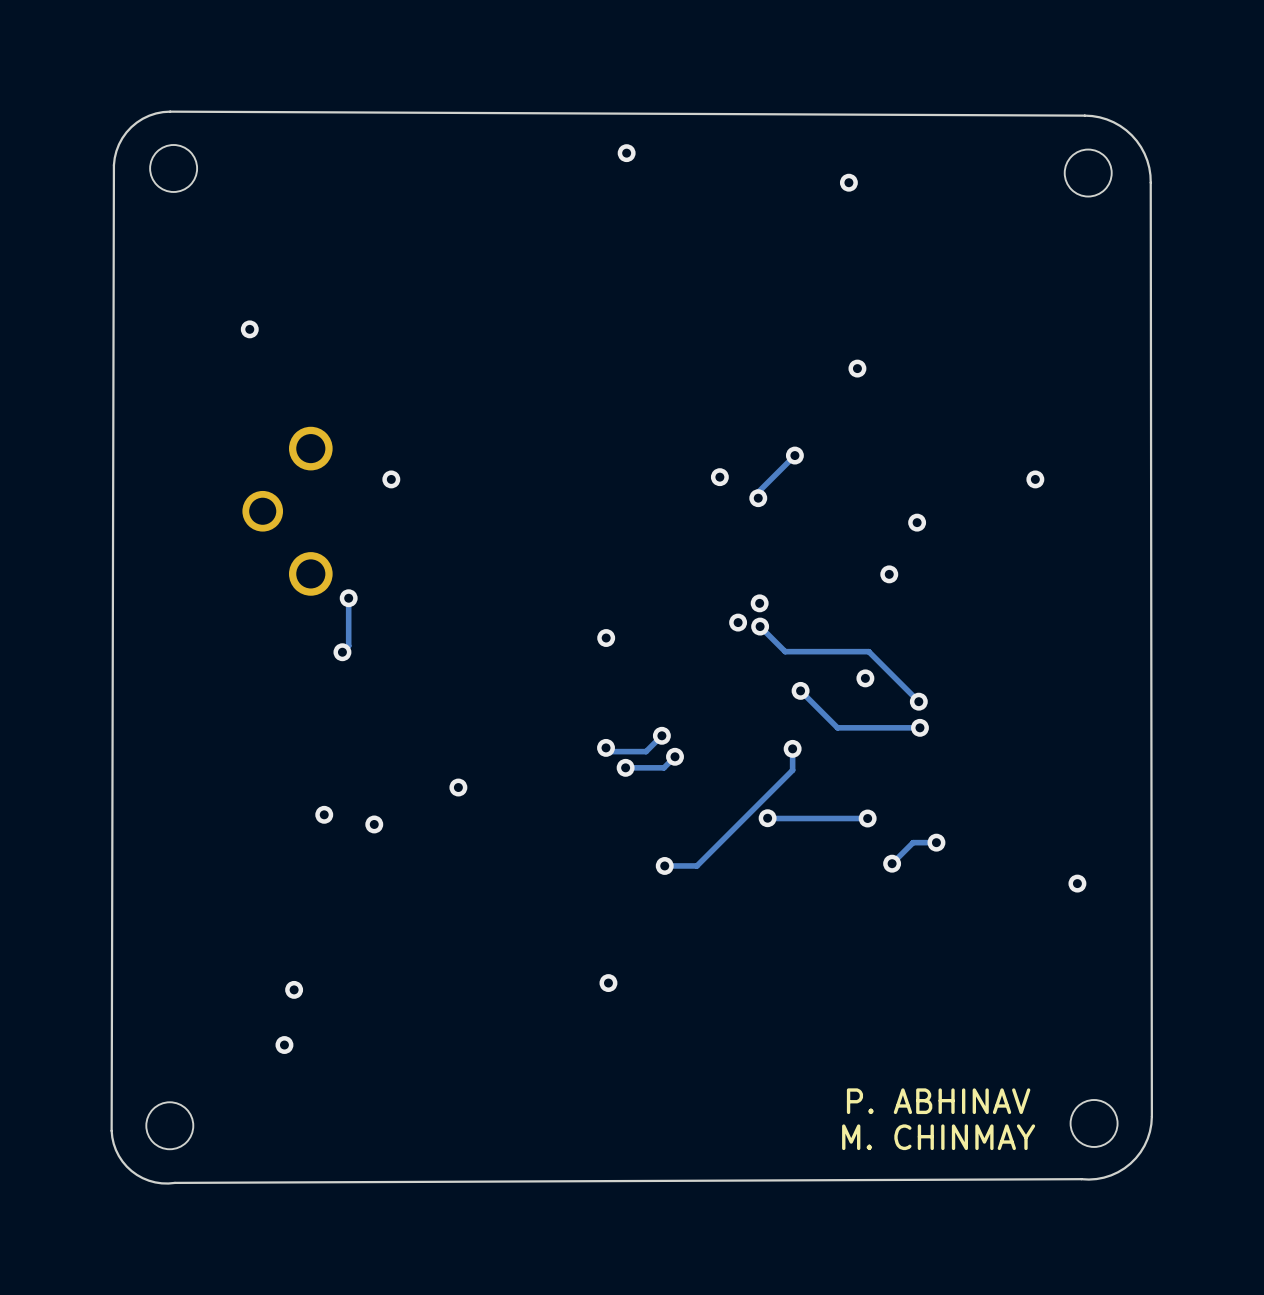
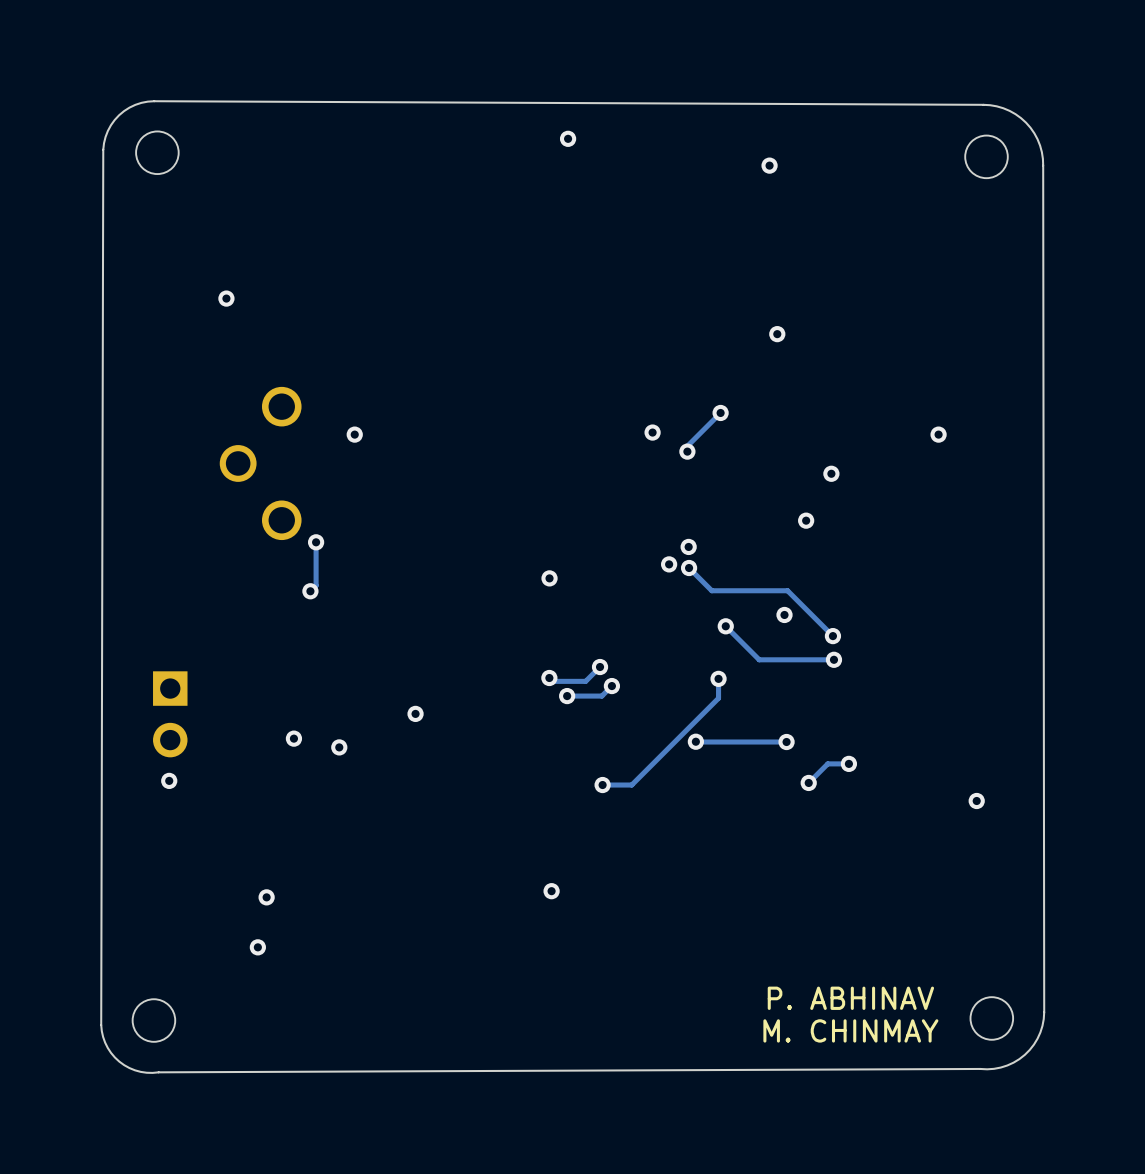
part: none -> (170, 714)
via: none -> (169, 780)

